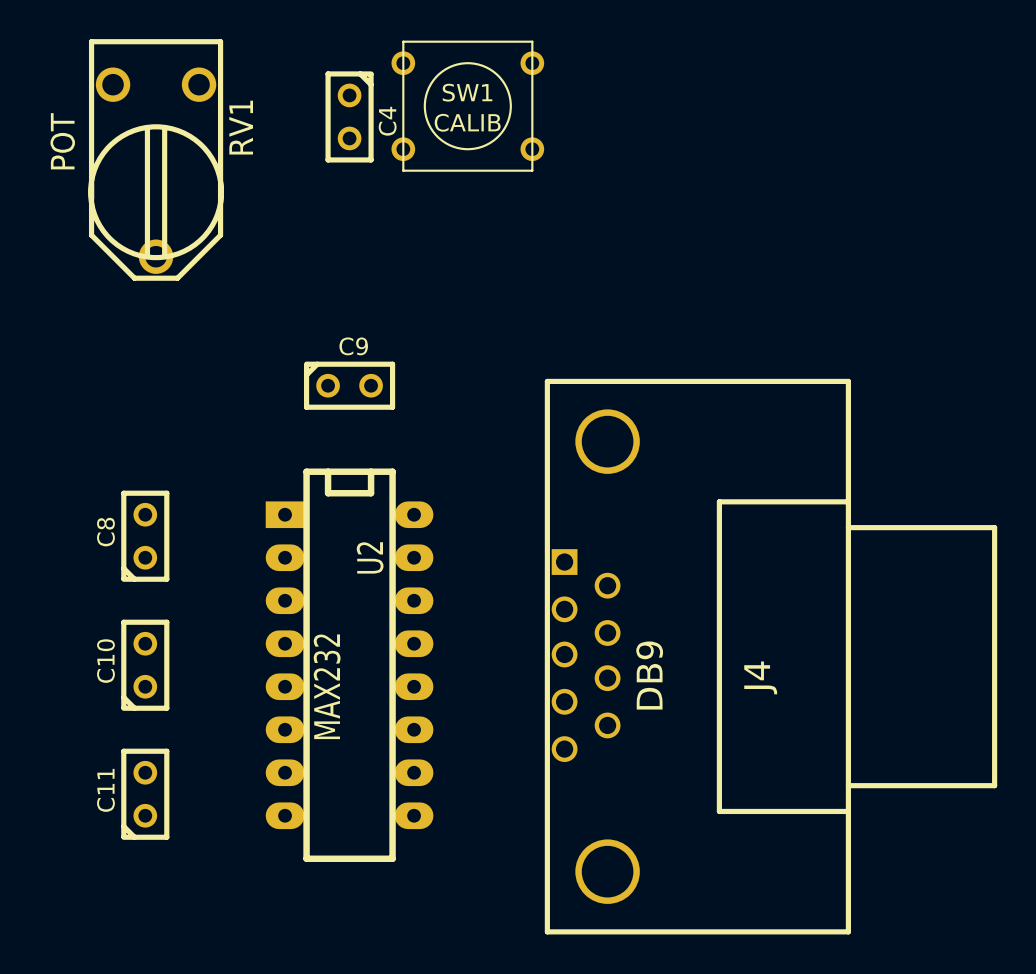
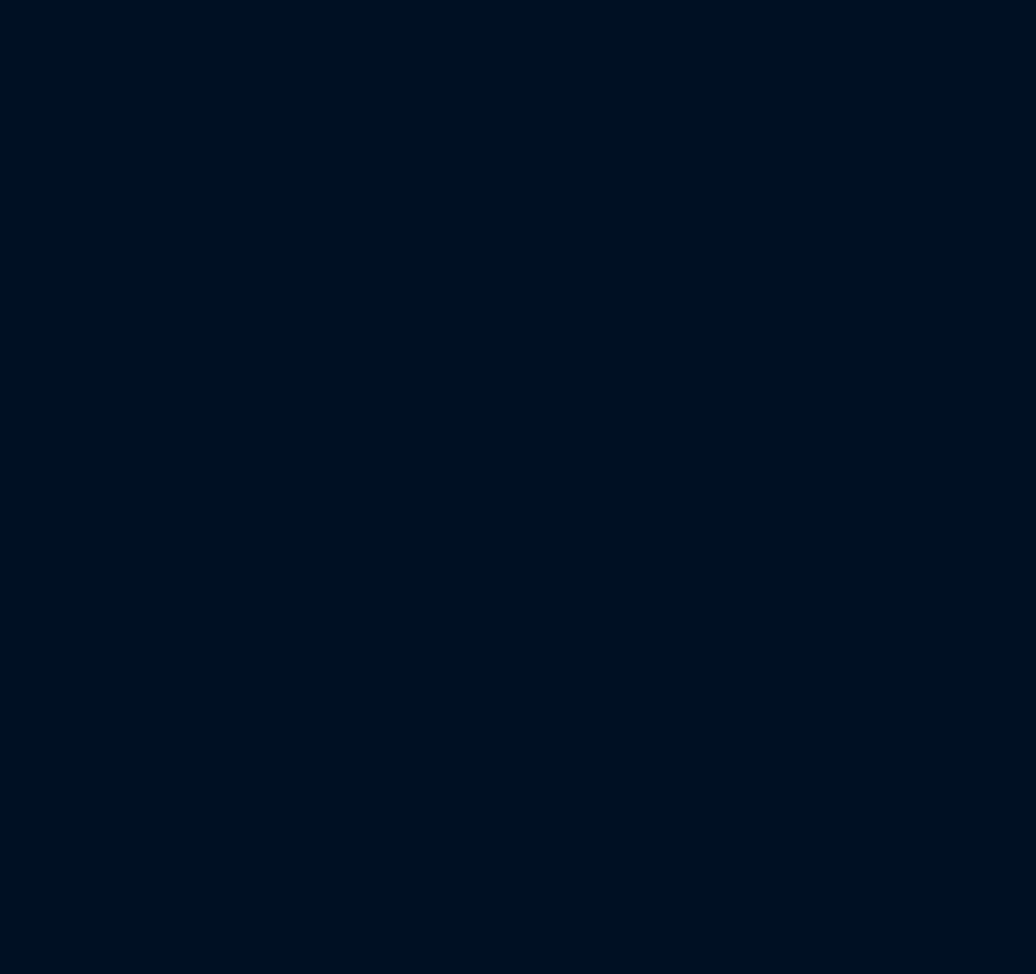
SW1: CALIB (467, 106) -> none
C4: (349, 116) -> none
RV1: POT (156, 159) -> none
C9: (349, 385) -> none
C8: (145, 536) -> none
J4: DB9 (771, 656) -> none
C10: (145, 665) -> none
U2: MAX232 (349, 665) -> none
C11: (145, 794) -> none

